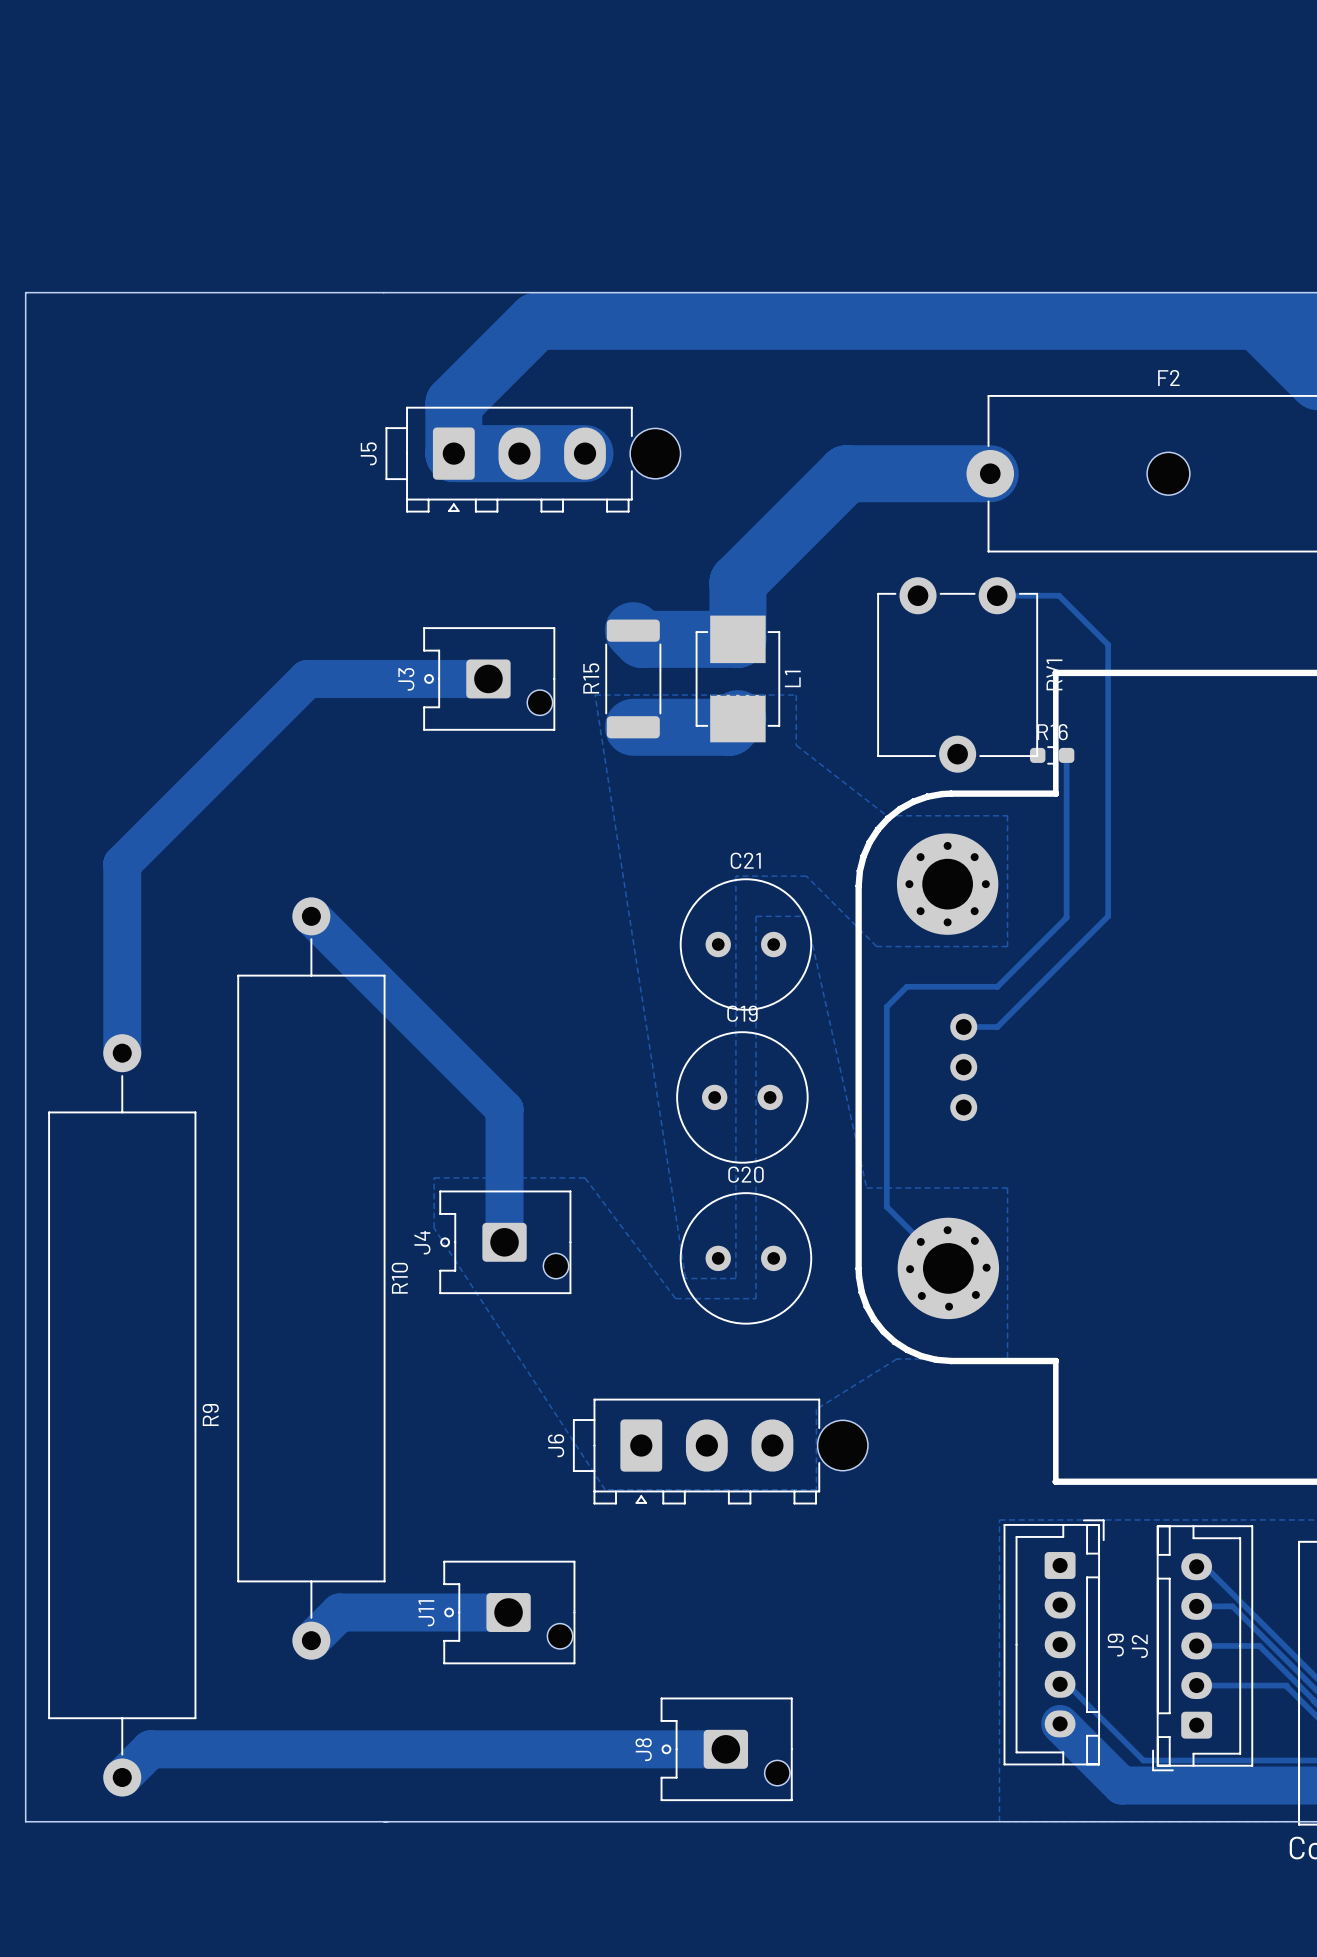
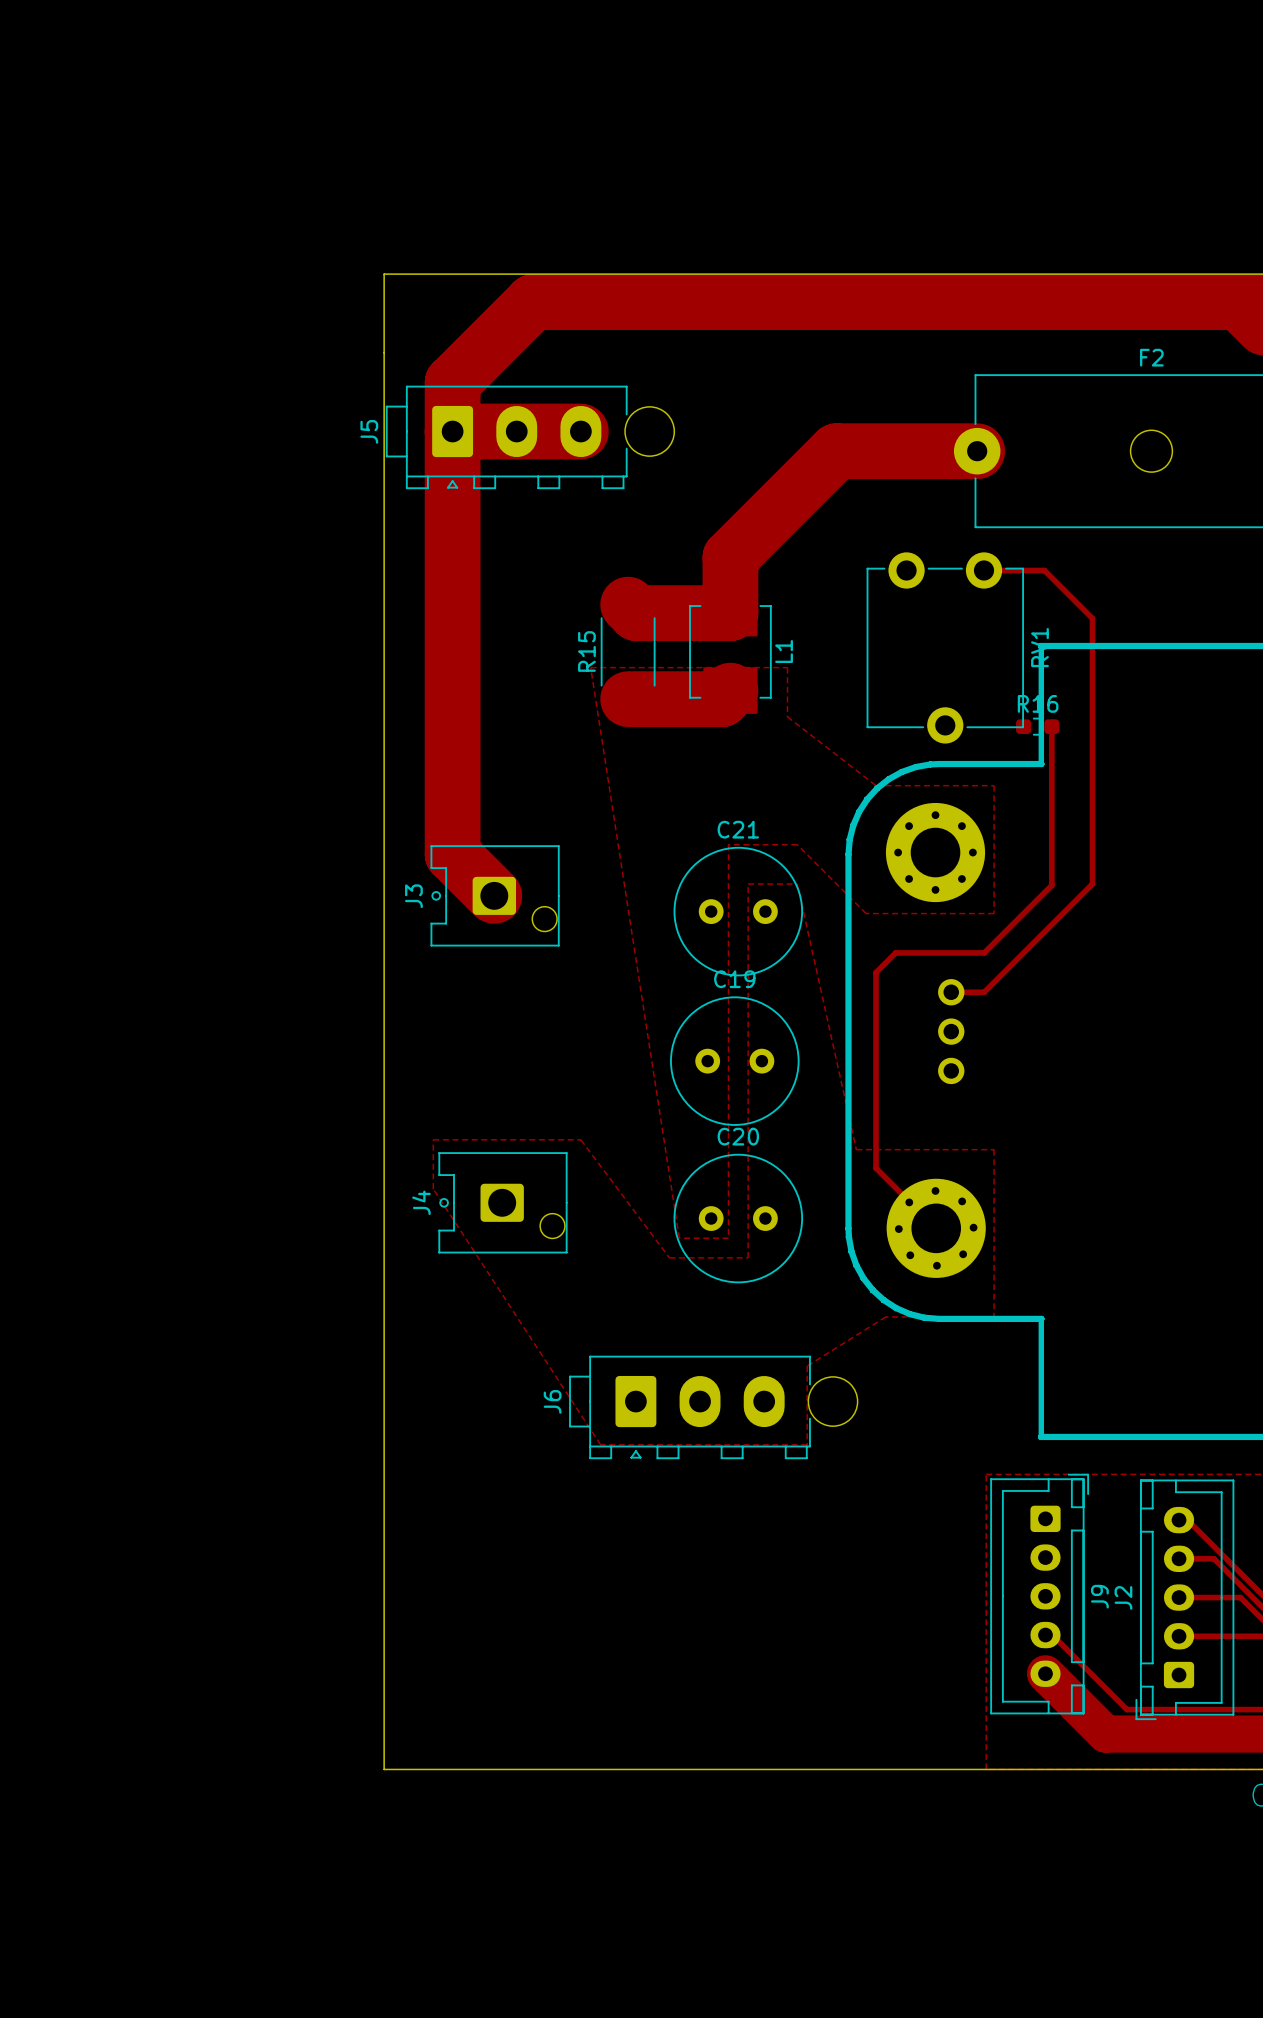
board edge: (383, 292) (25, 292) (25, 1821) (383, 1821) -> (384, 274) (384, 1769)
track: none -> (452, 431) (452, 854) (494, 895)
track: (488, 678) (307, 678) (122, 864) (122, 1053) -> none
J3 position: (489, 678) -> (495, 895)
track: (311, 916) (504, 1109) (504, 1242) -> none
R10: (311, 1278) -> none
R9: (122, 1415) -> none
track: (508, 1612) (339, 1612) (311, 1640) -> none
J11: (509, 1612) -> none
track: (725, 1749) (150, 1749) (122, 1777) -> none
J8: (726, 1749) -> none

